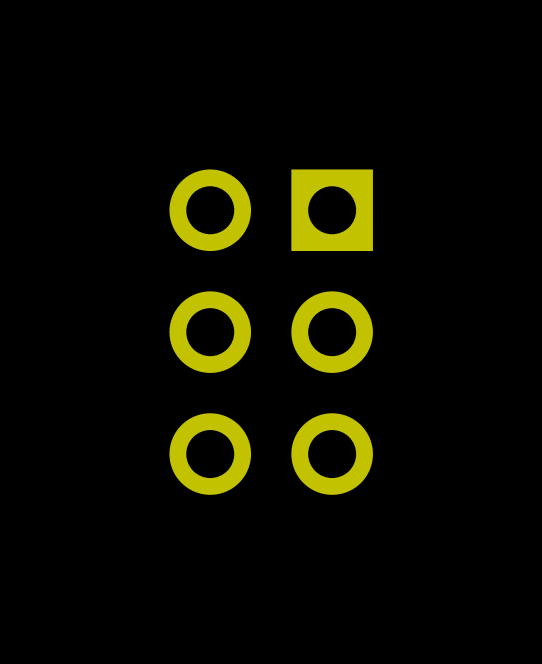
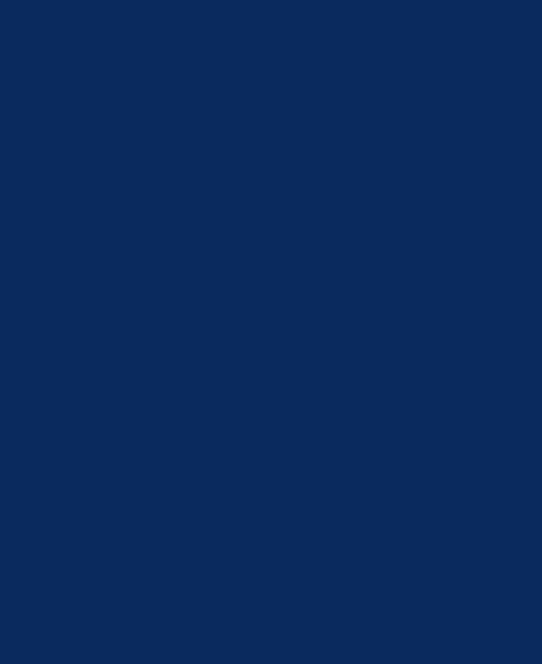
part: (271, 332) -> none

